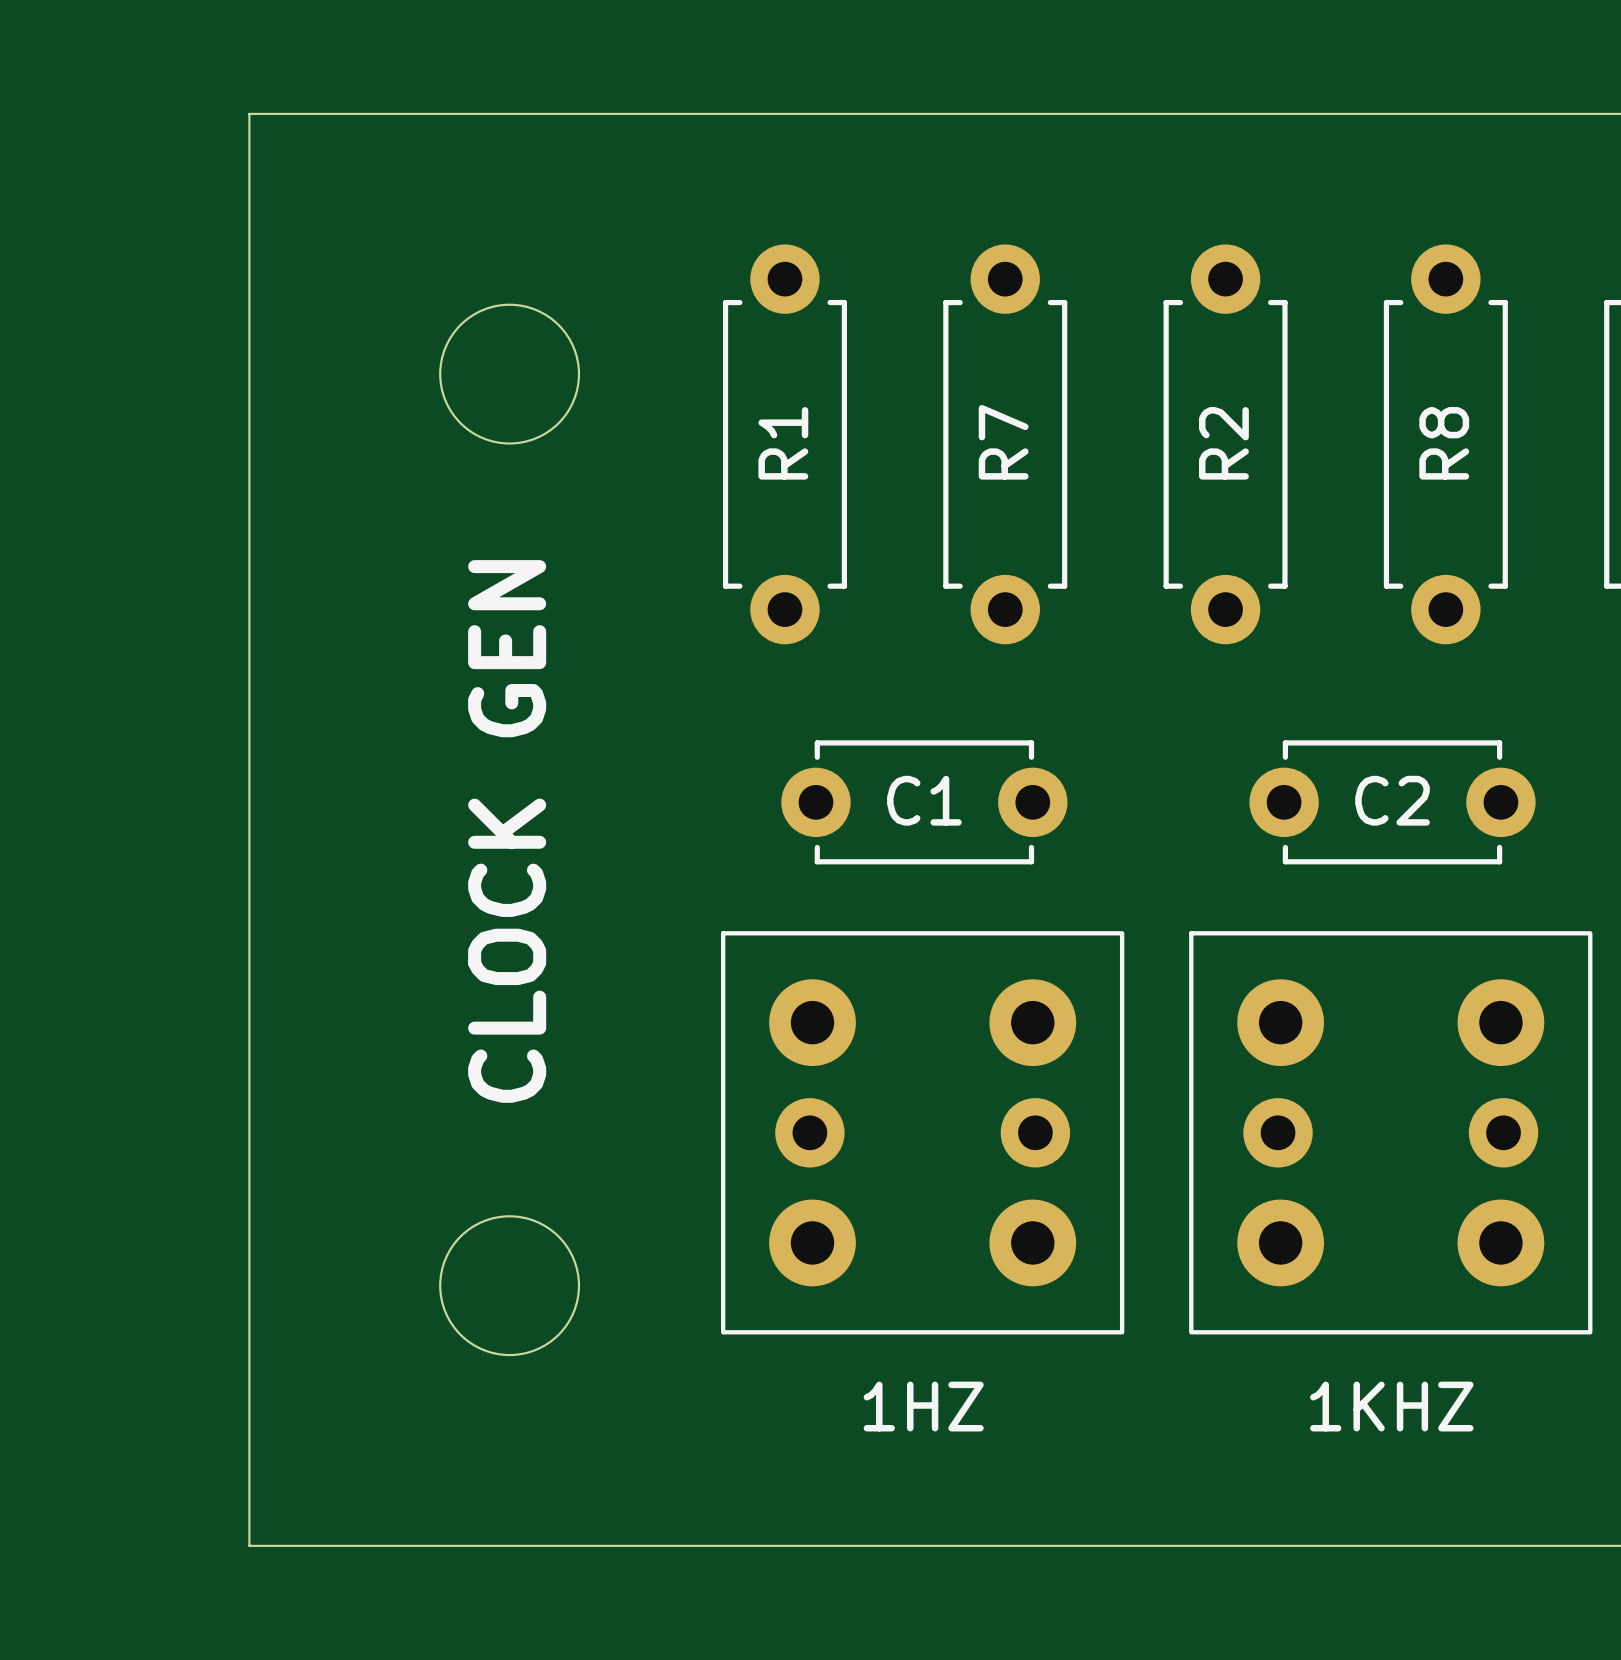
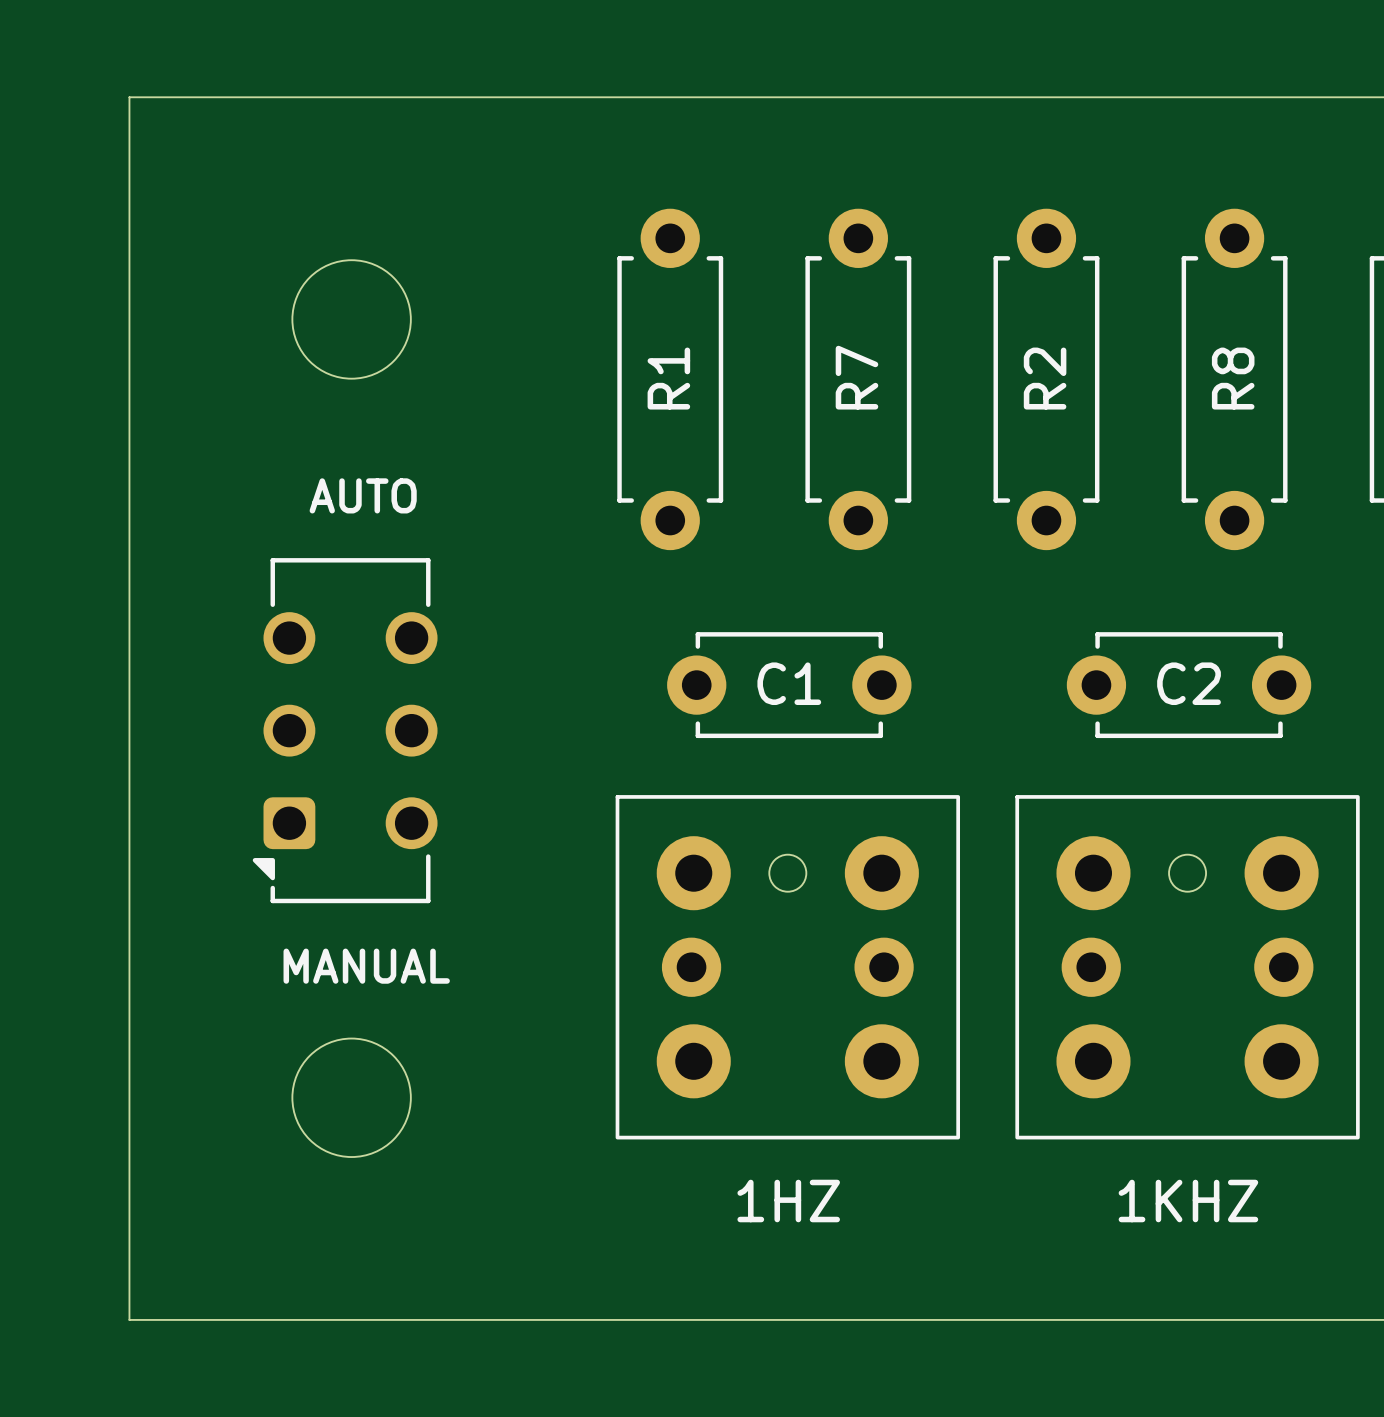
board edge: (249, 113) (249, 1545) -> (212, 97) (129, 97) (129, 1319) (212, 1319)
round board edge position: (509, 374) -> (351, 319)
text: none -> AUTO (363, 495)
text: CLOCK GEN (507, 831) -> none
part: none -> (345, 730)
part footprint: [721, 931, 1125, 1335] -> [615, 795, 961, 1140]
part footprint: [1189, 931, 1593, 1335] -> [1015, 795, 1360, 1140]
text: none -> MANUAL (366, 966)
round board edge position: (509, 1285) -> (351, 1097)

